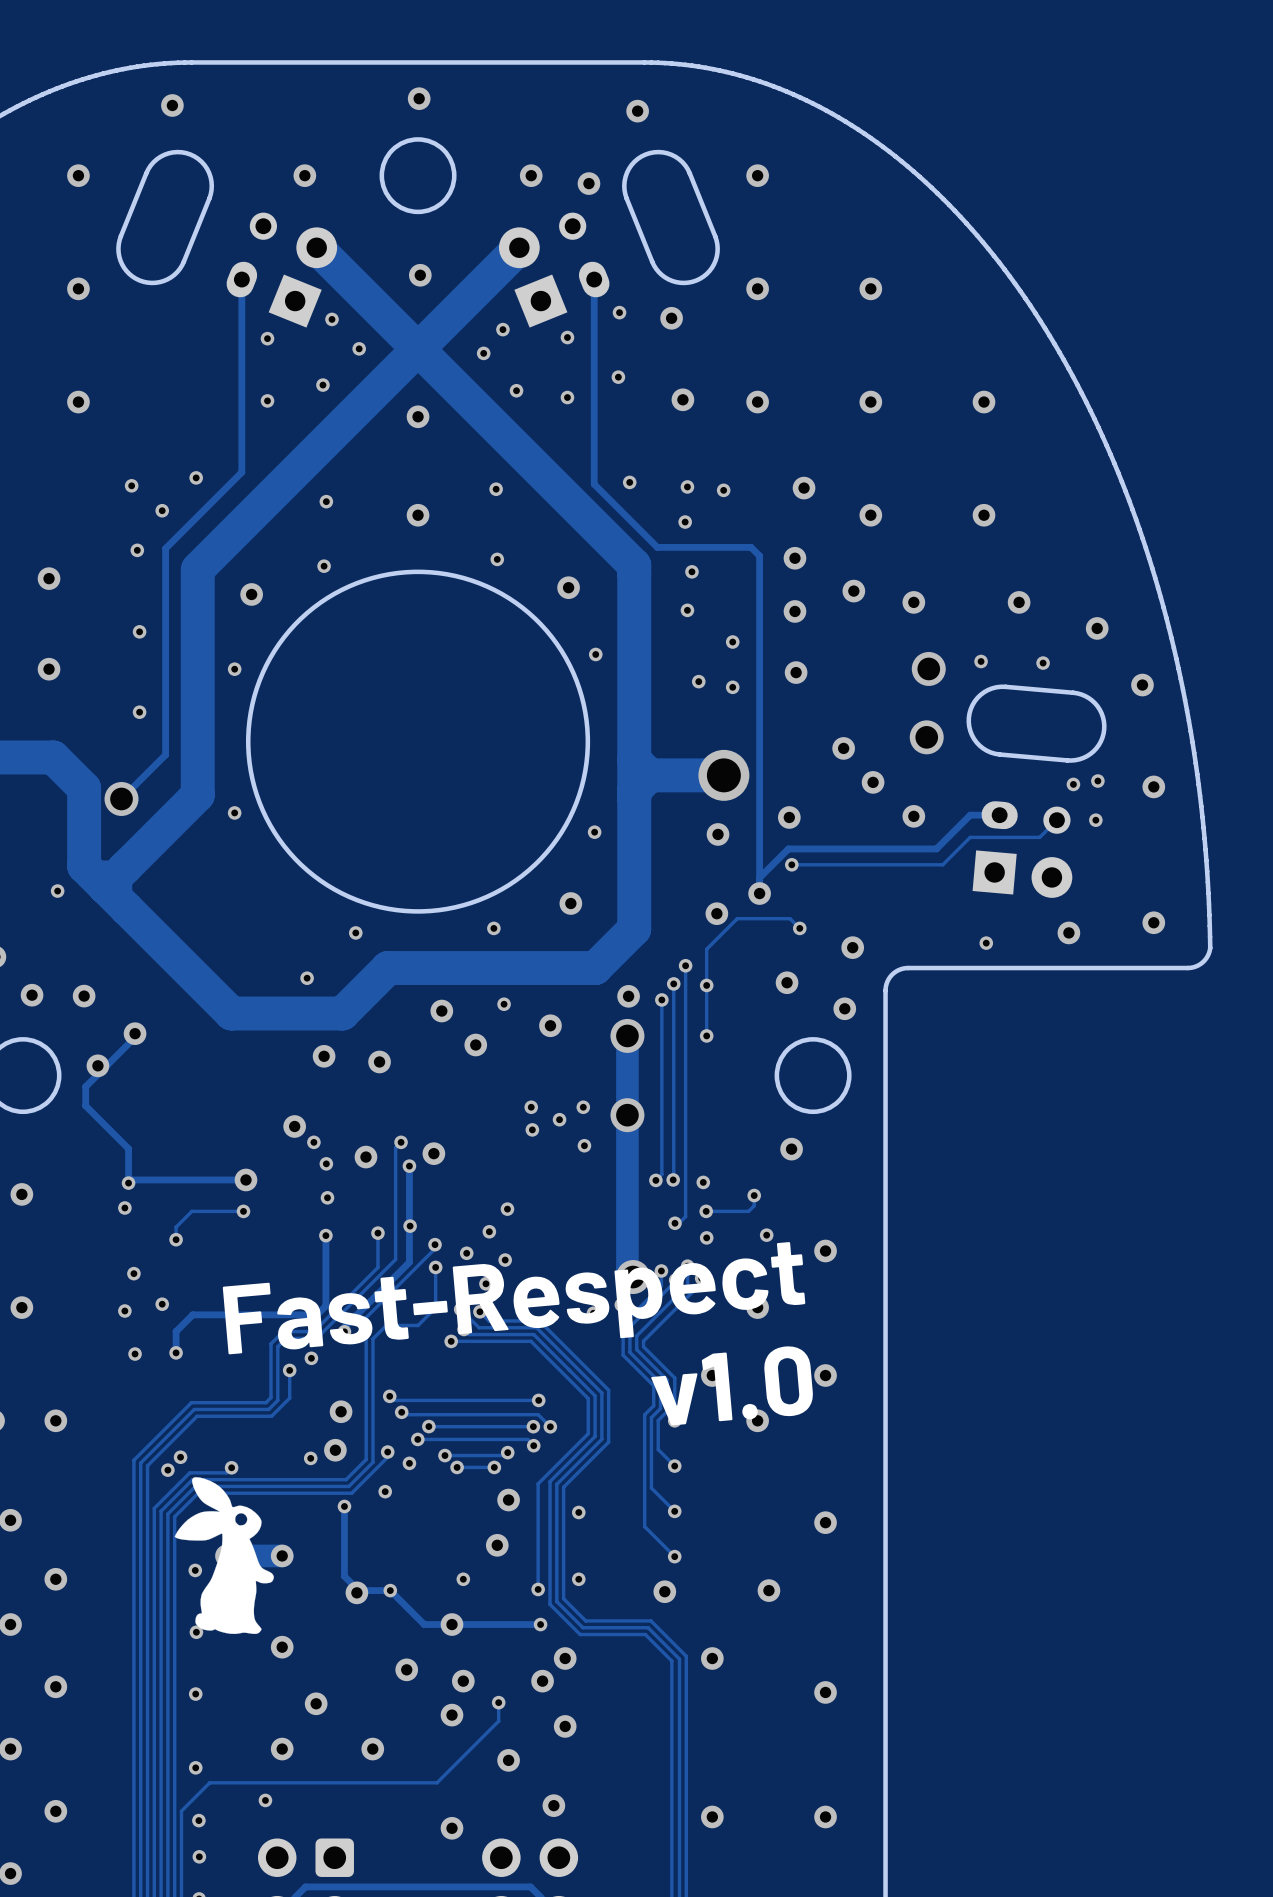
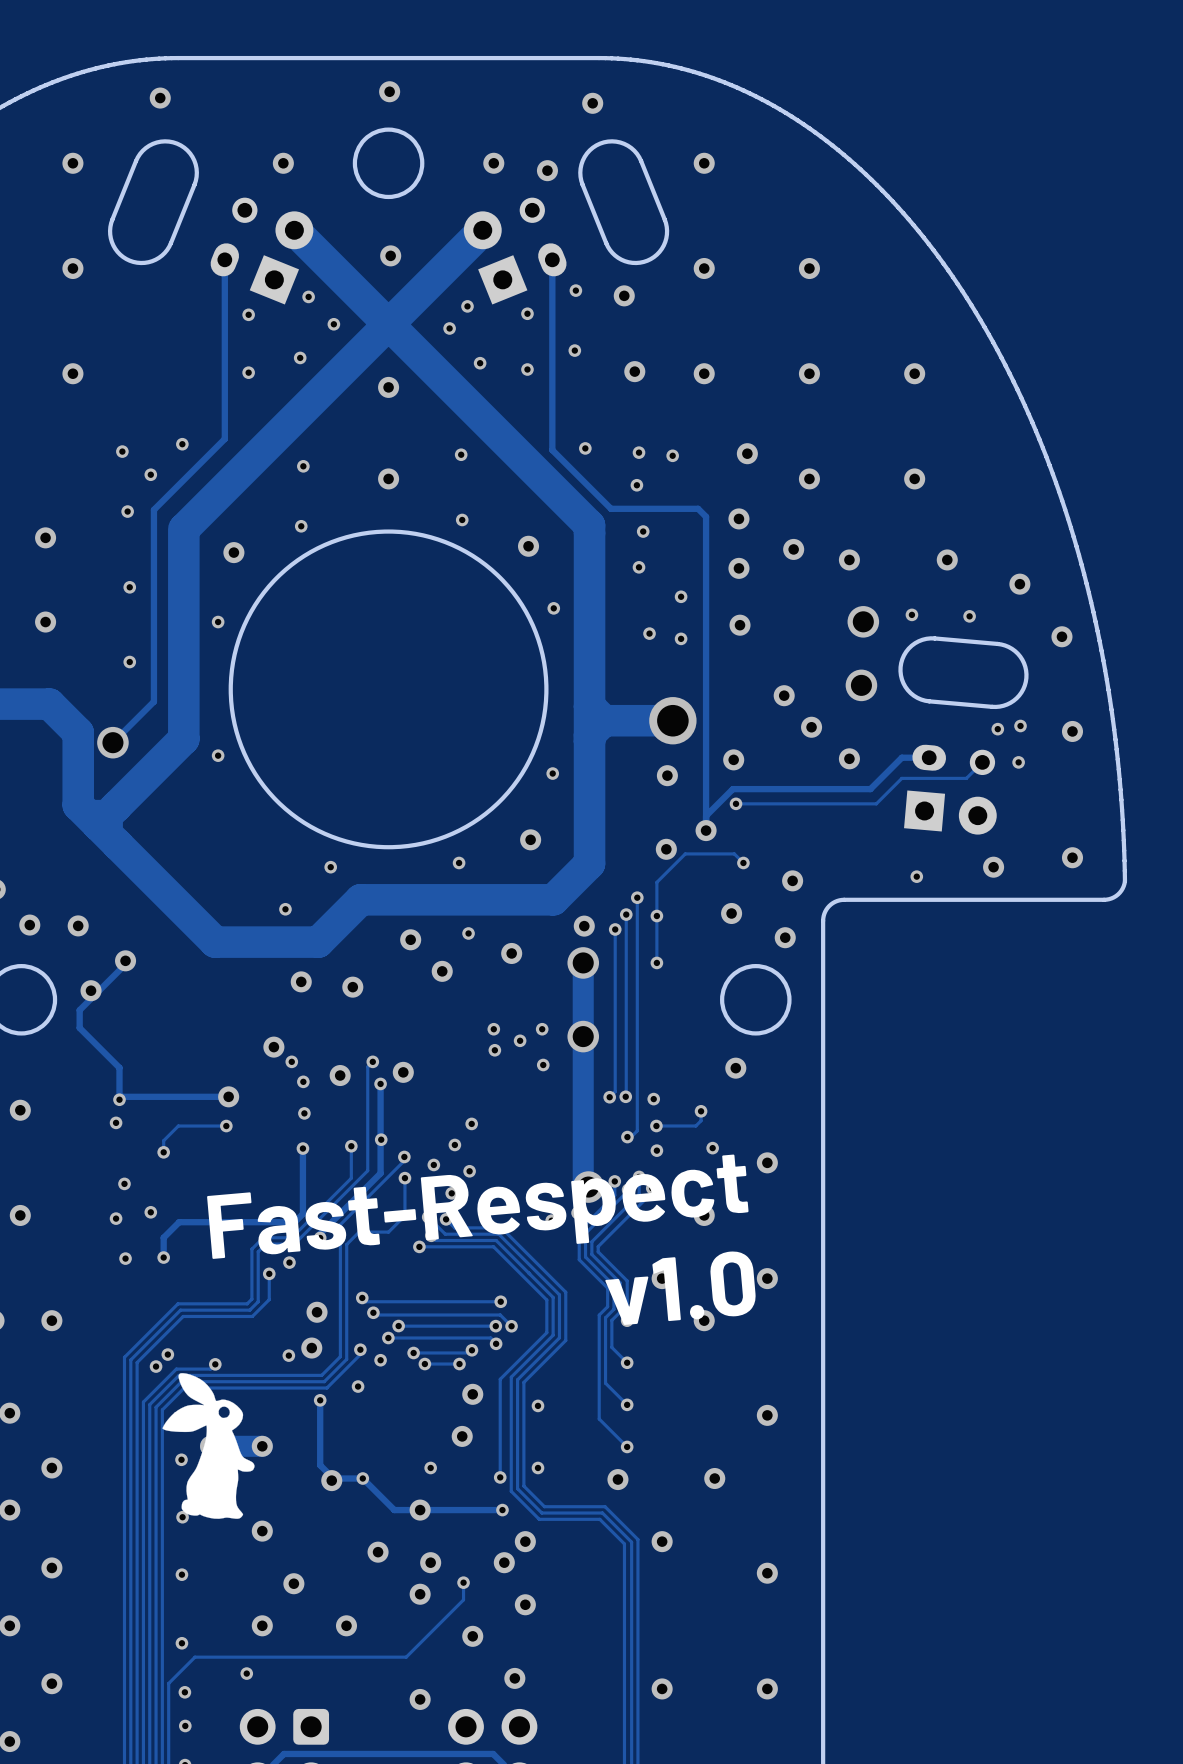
via: (57, 891) -> none

